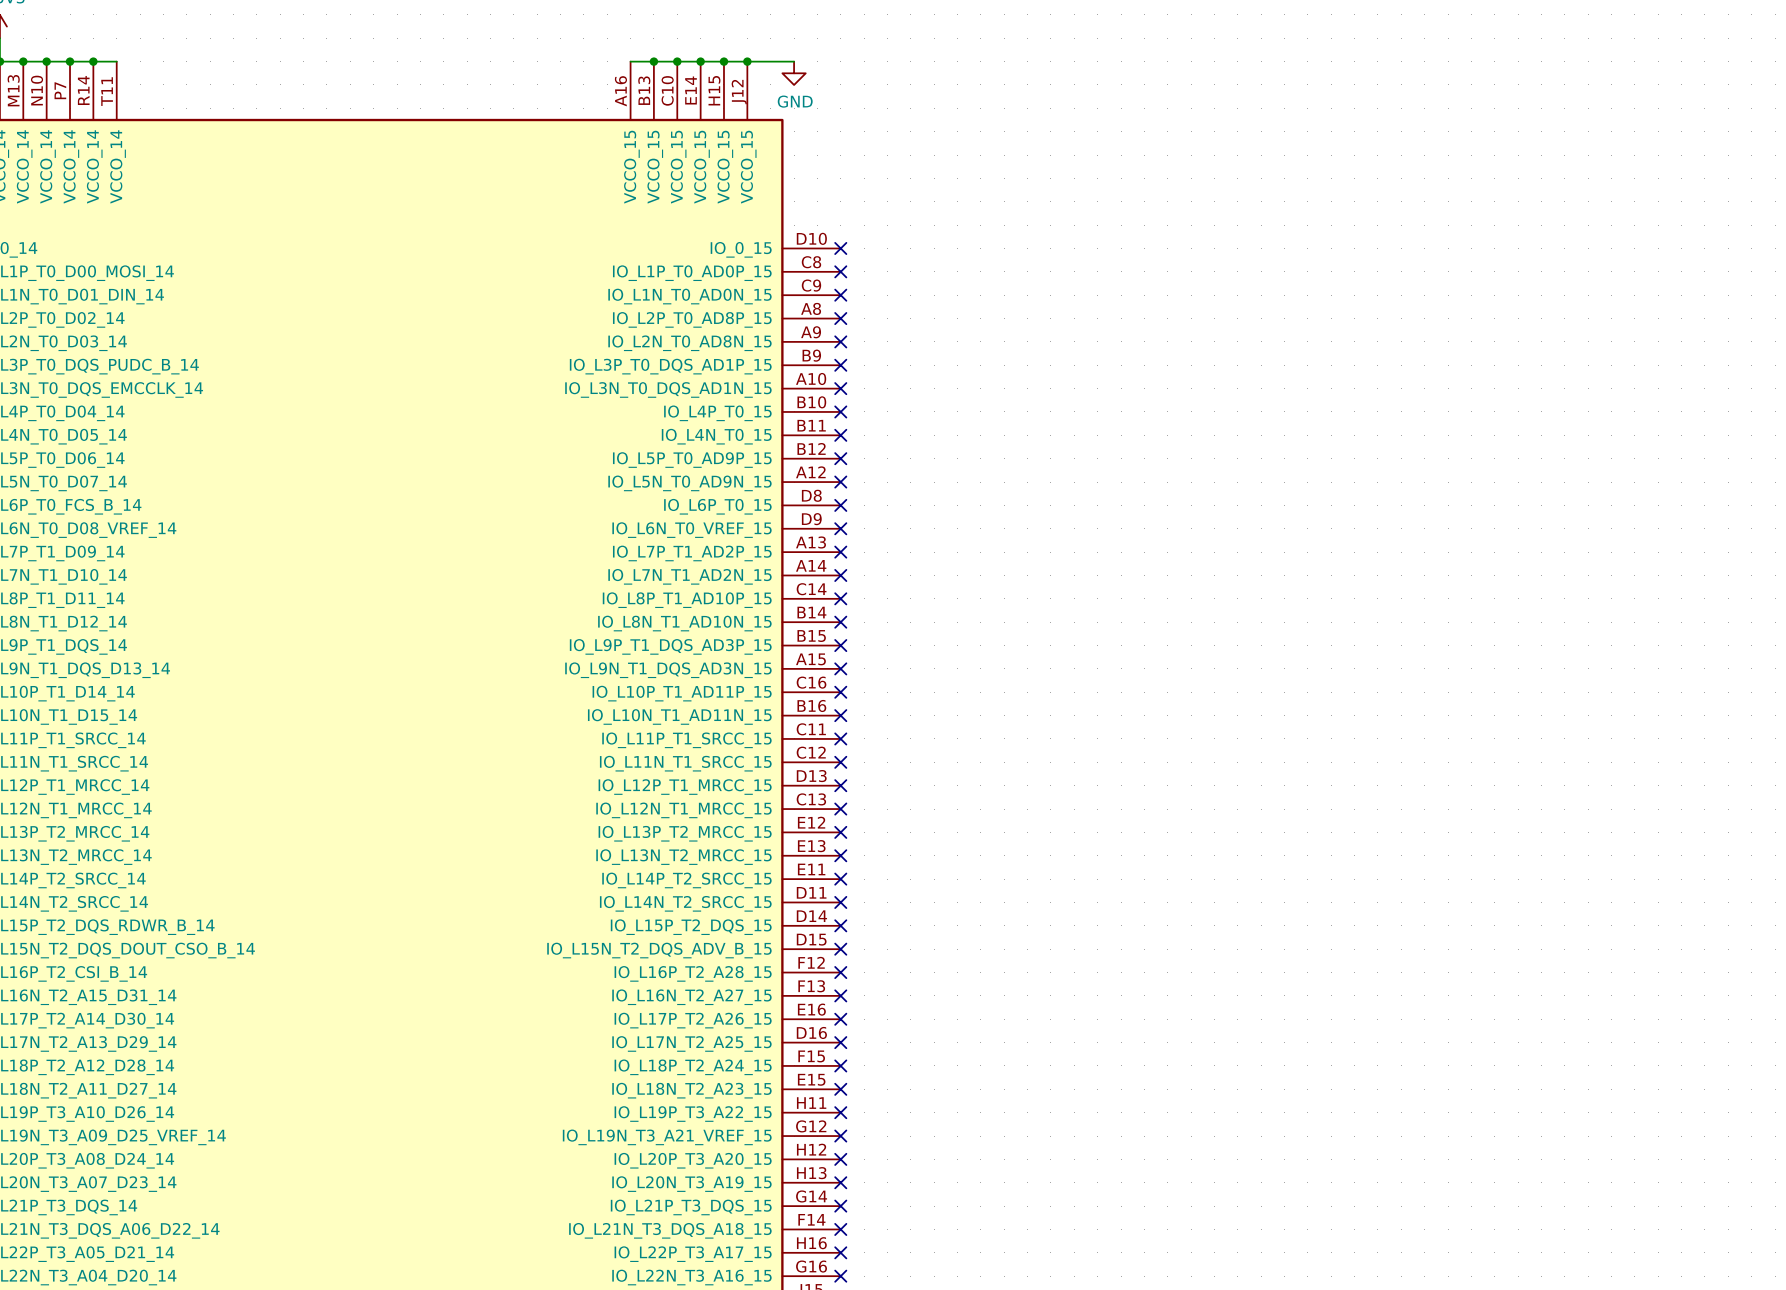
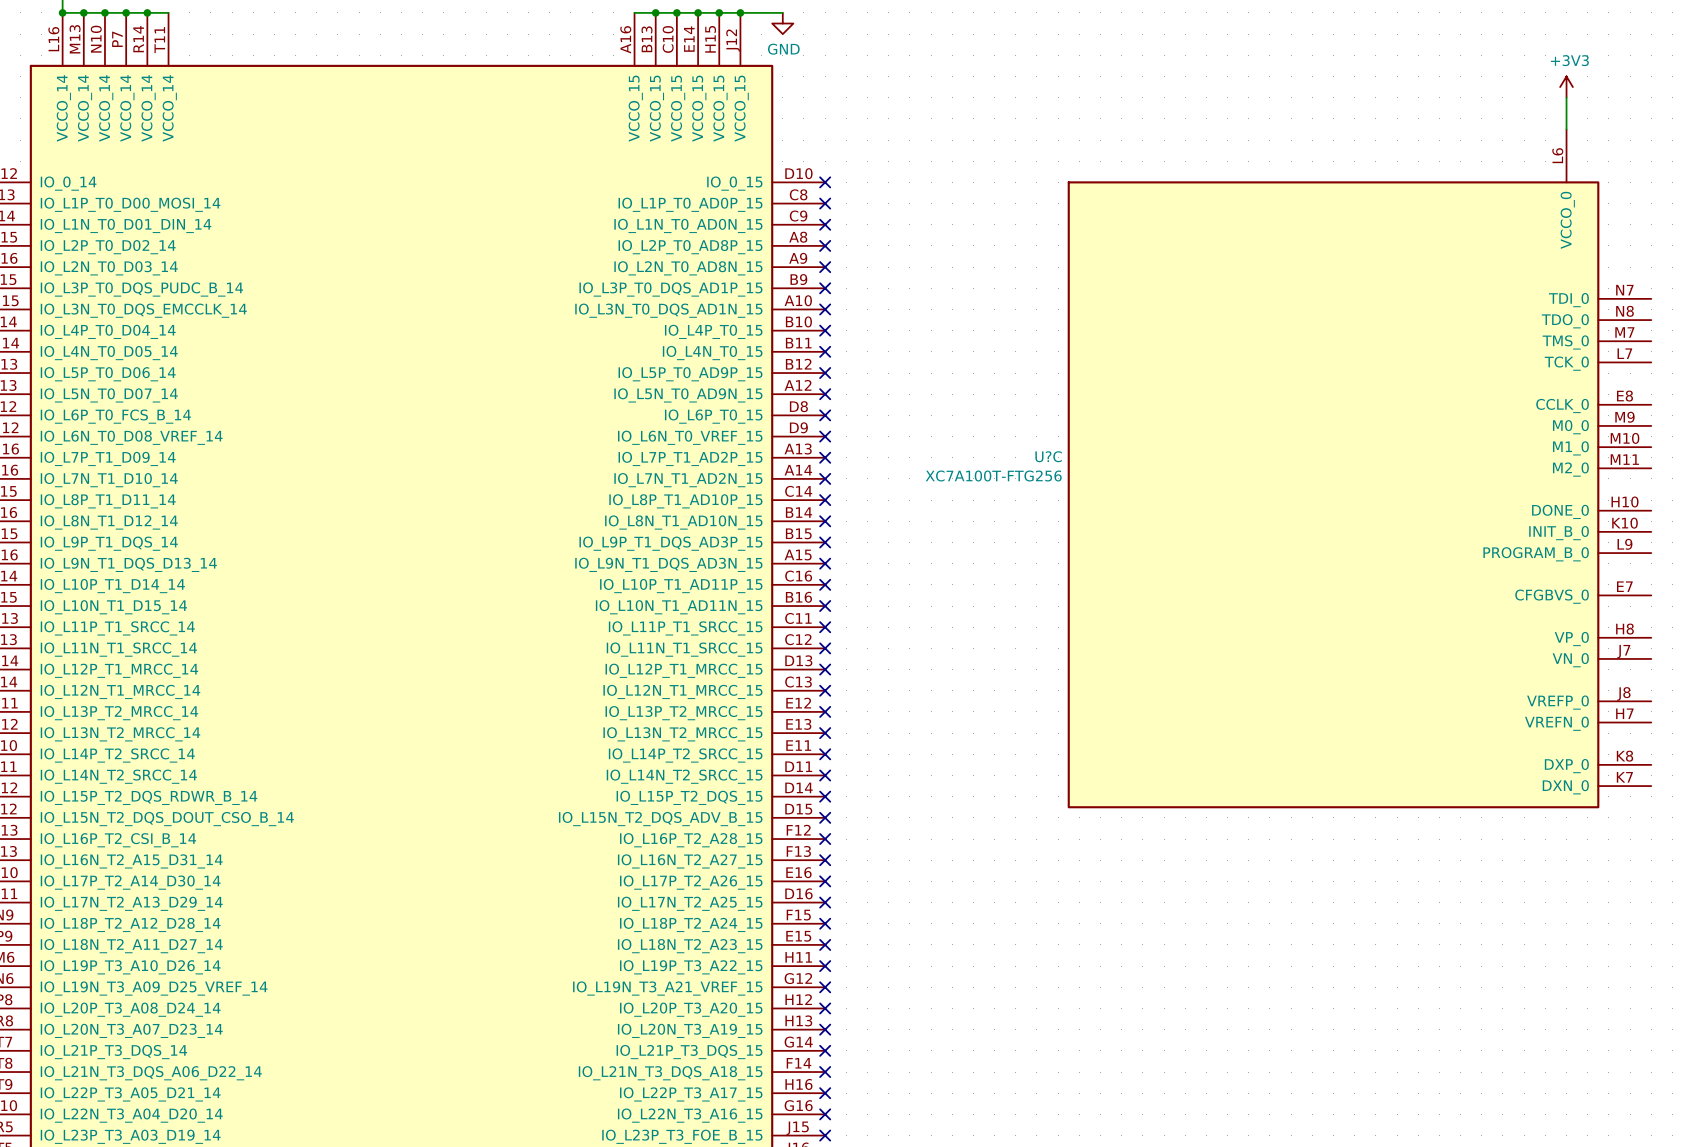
power symbol: none -> +3V3 (1566, 87)
wire: none -> (1566, 97) (1566, 129)
U?C: none -> XC7A100T-FTG256 (1359, 468)

